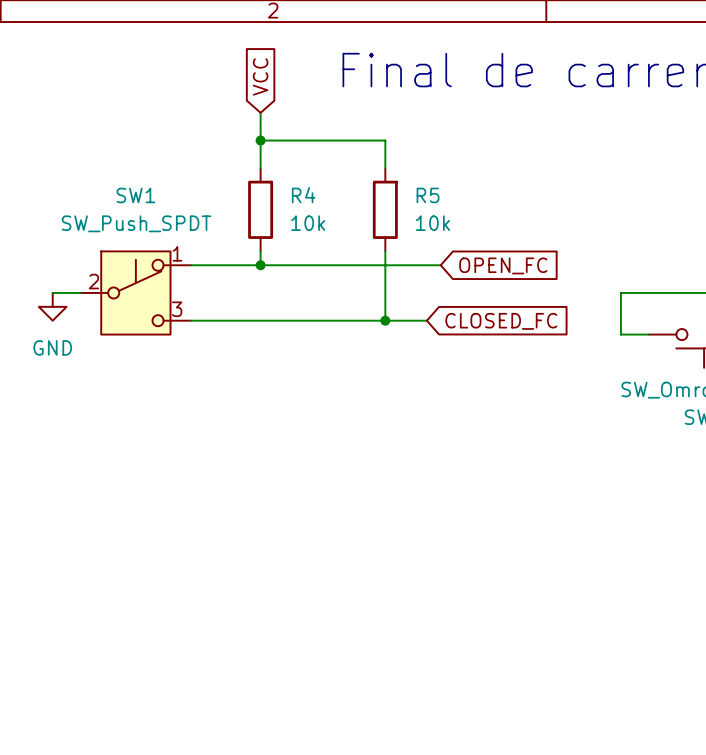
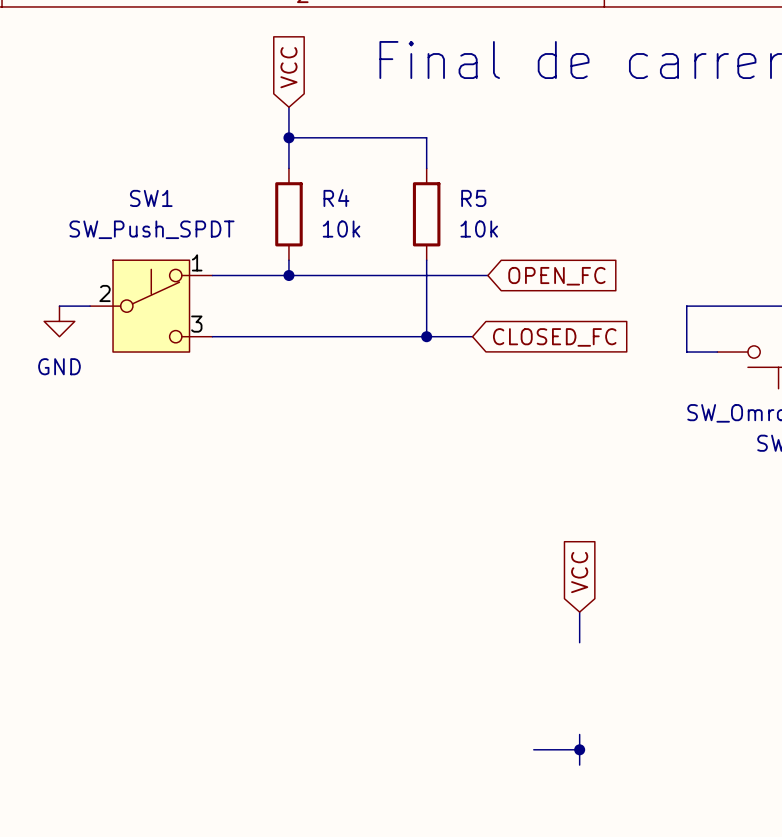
global label: none -> VCC (579, 572)
wire: none -> (579, 612) (579, 642)
wire: none -> (579, 734) (579, 765)
wire: none -> (533, 749) (579, 749)
junction: none -> (579, 749)

